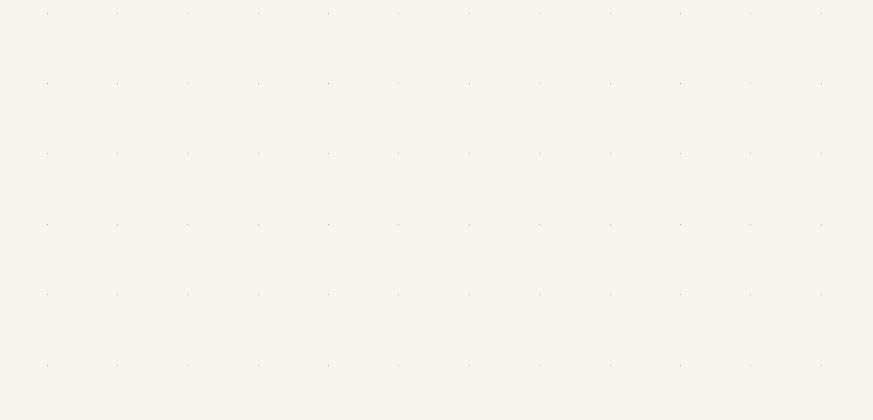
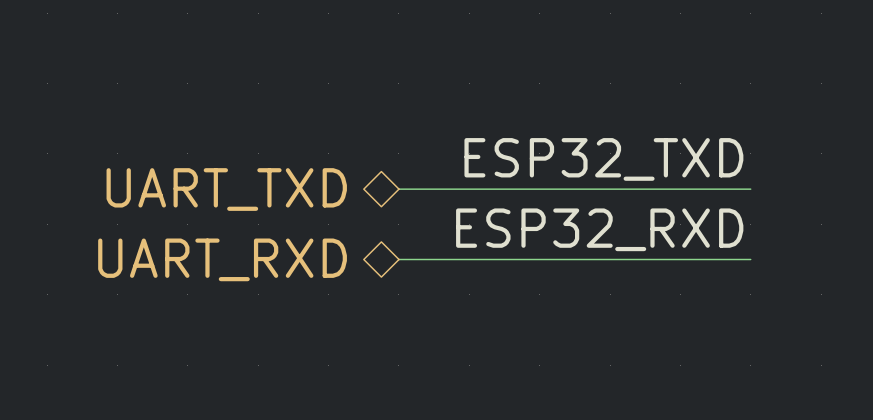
label: none -> ESP32_TXD (603, 159)
hierarchical label: none -> UART_TXD (226, 189)
wire: none -> (398, 189) (750, 189)
label: none -> ESP32_RXD (599, 229)
hierarchical label: none -> UART_RXD (222, 259)
wire: none -> (398, 259) (750, 259)

